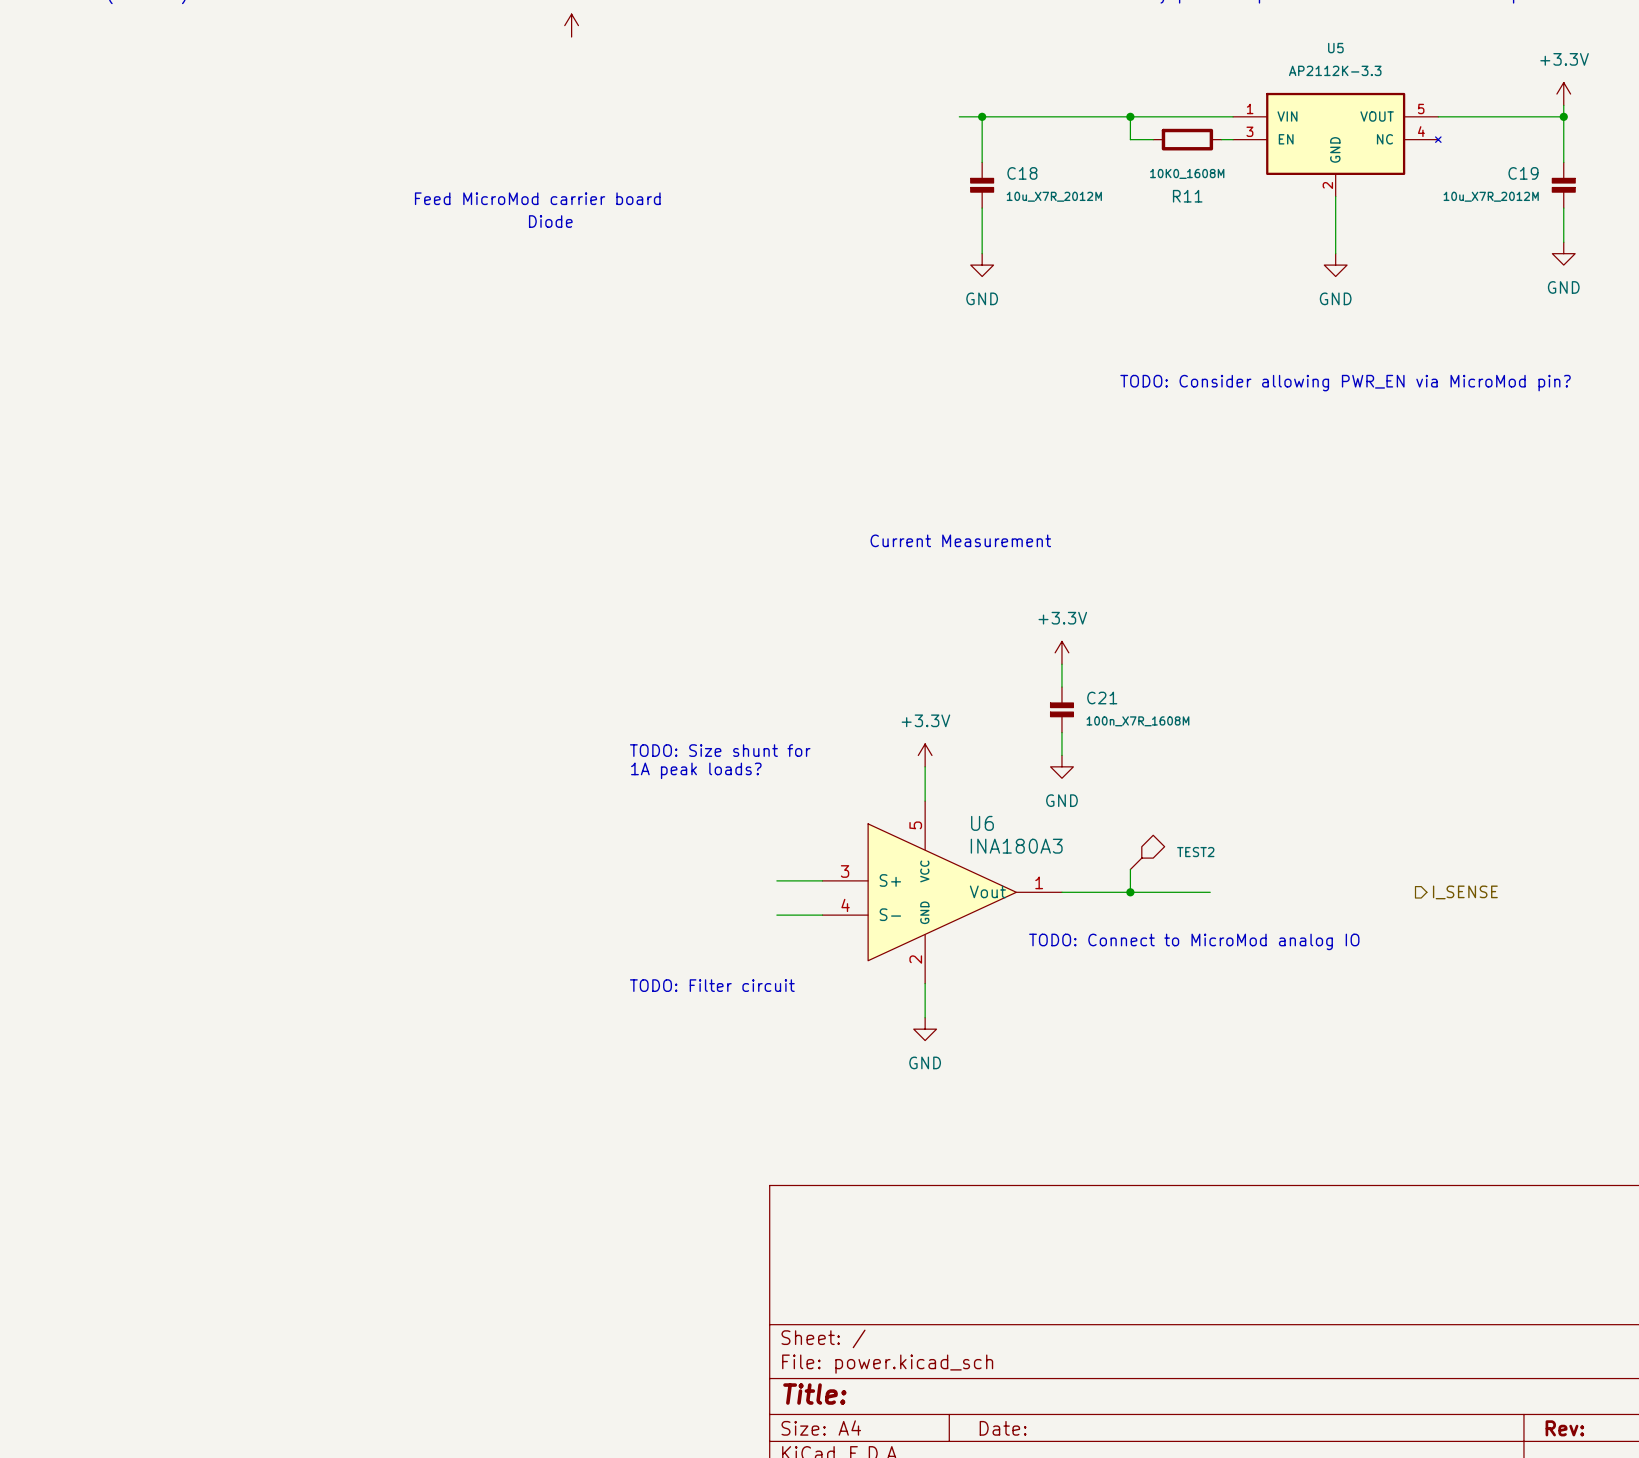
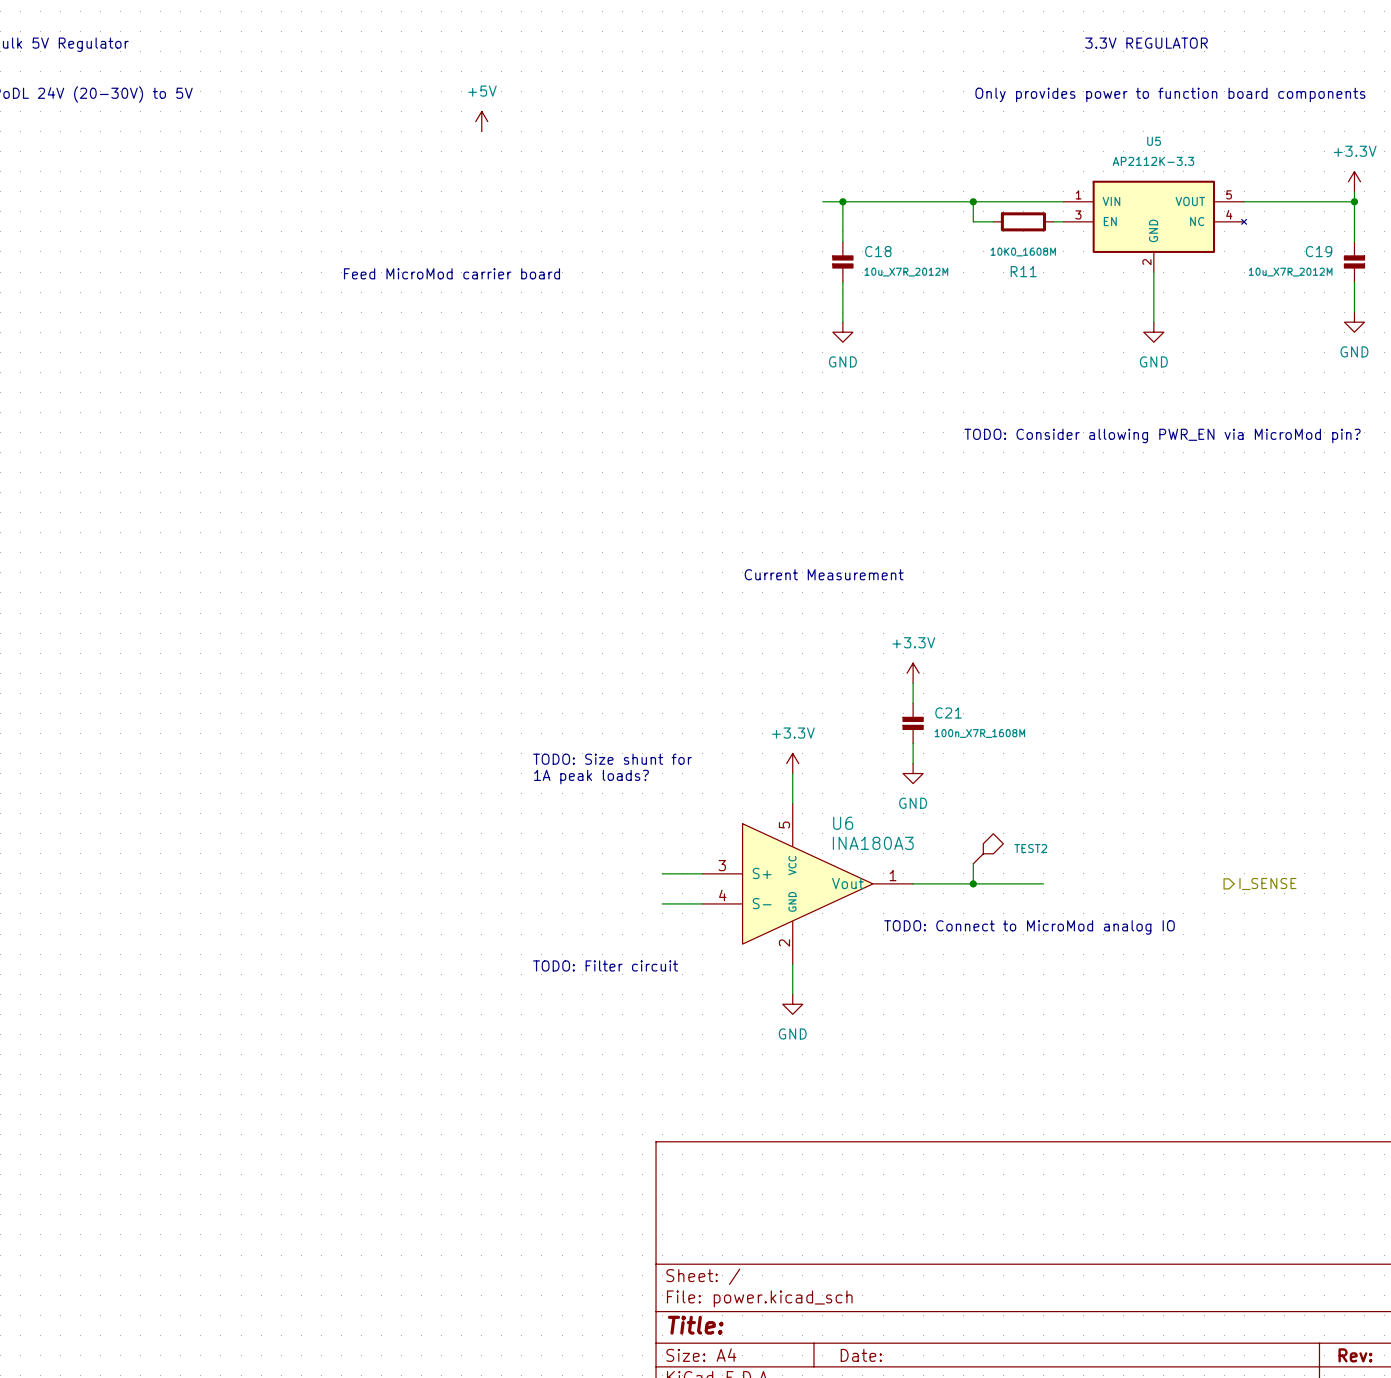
text: Diode (550, 221) -> none

